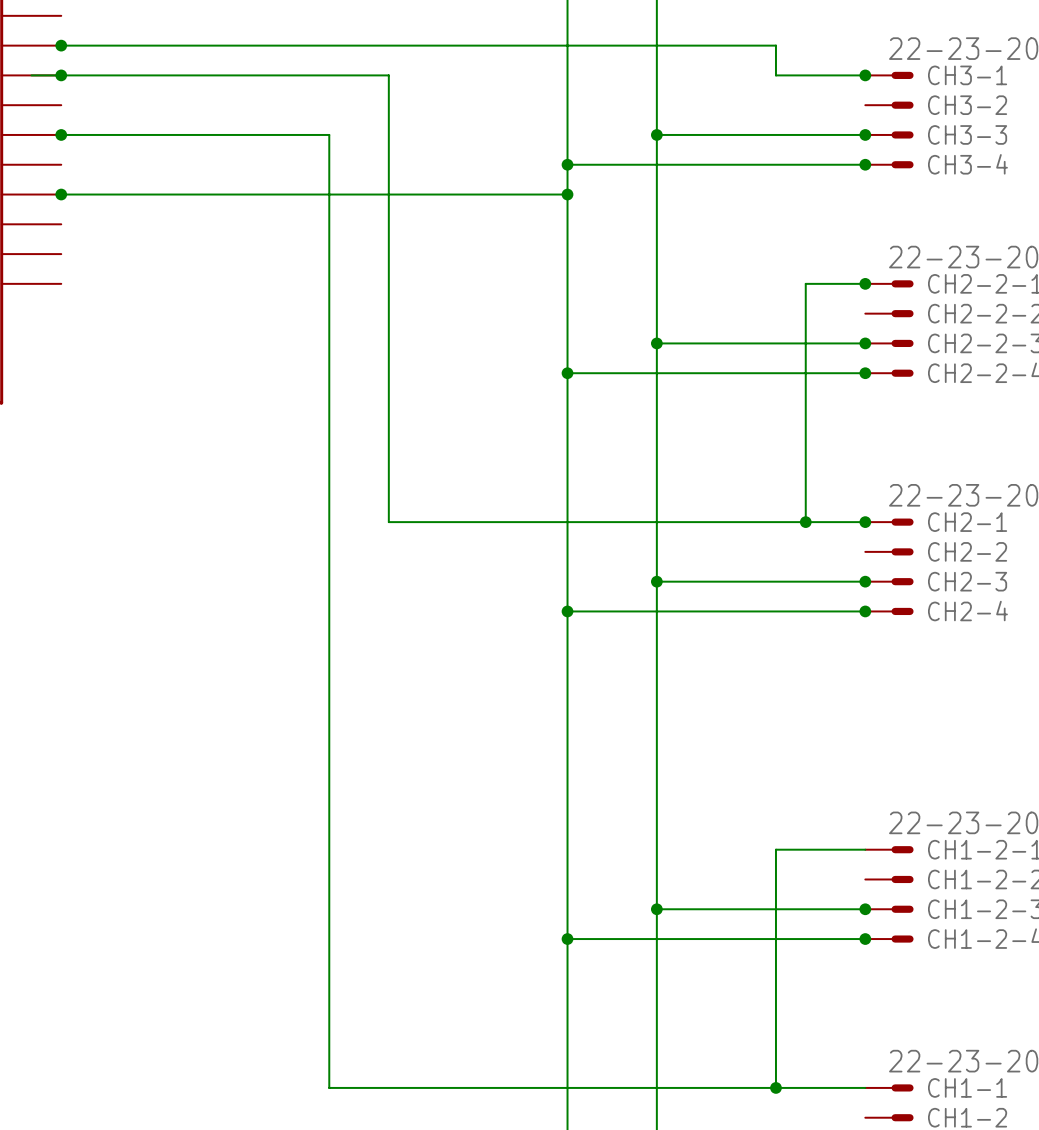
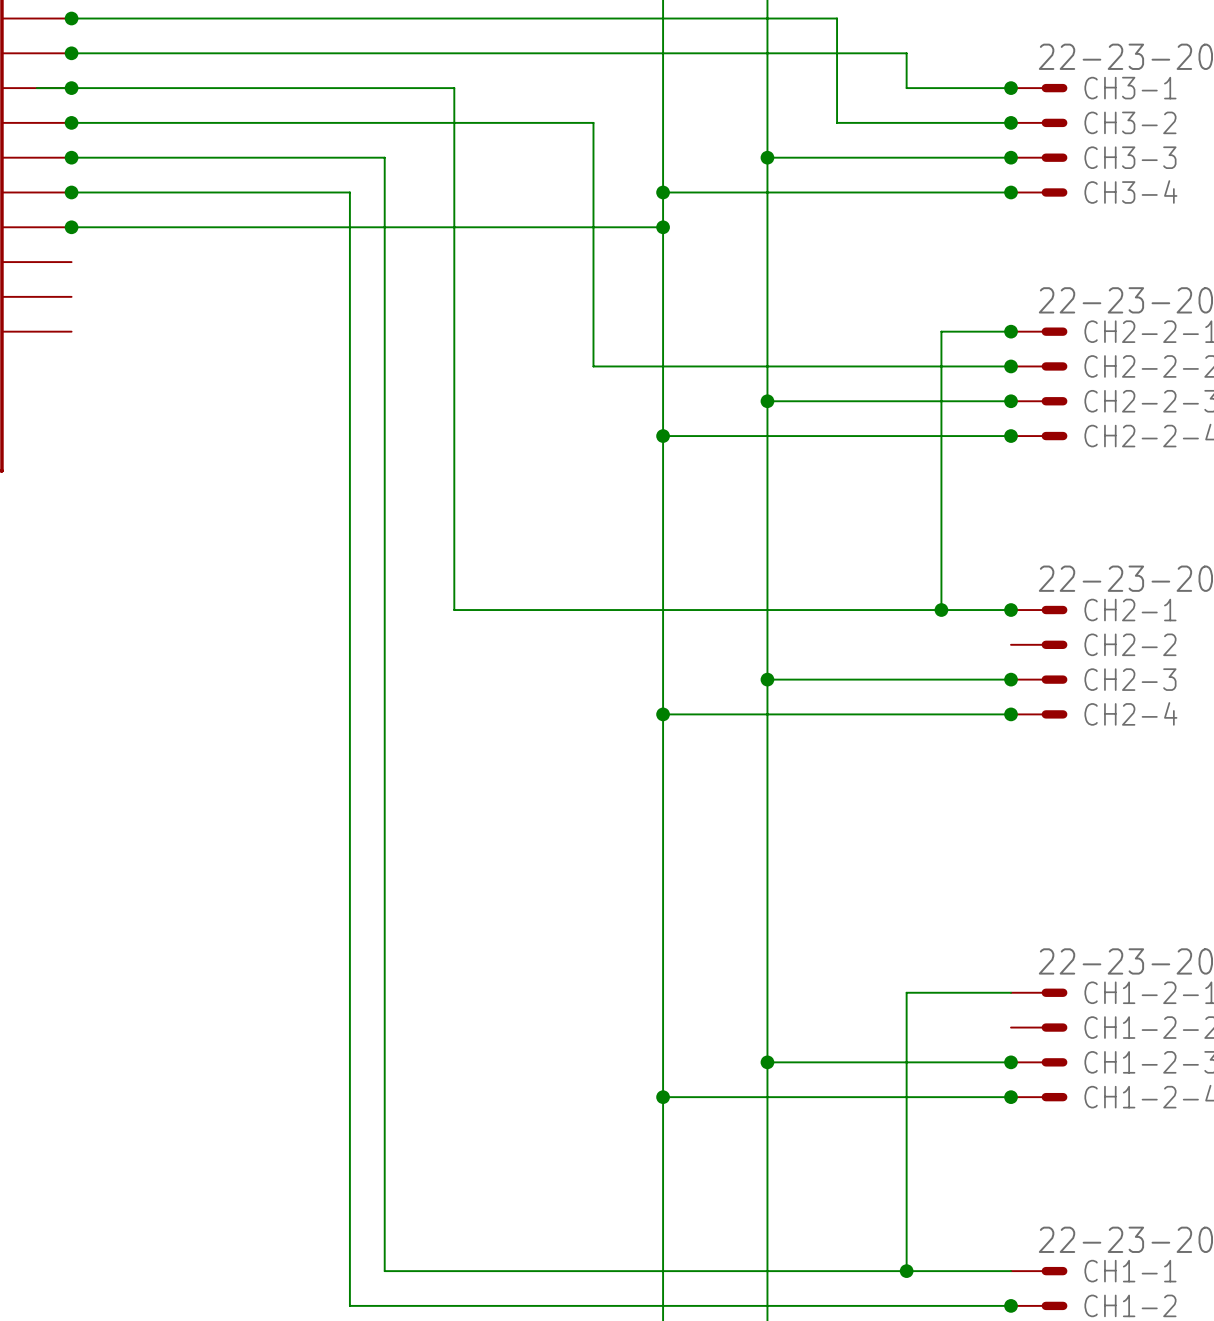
wire: none -> (71, 18) (837, 18) (837, 122) (1011, 122)
junction: none -> (71, 18)
wire: none -> (71, 122) (593, 122) (593, 366) (1011, 366)
junction: none -> (71, 122)
junction: none -> (1011, 122)
wire: none -> (71, 192) (349, 192) (349, 1305) (1011, 1305)
junction: none -> (71, 192)
junction: none -> (1011, 366)
junction: none -> (1011, 1305)

